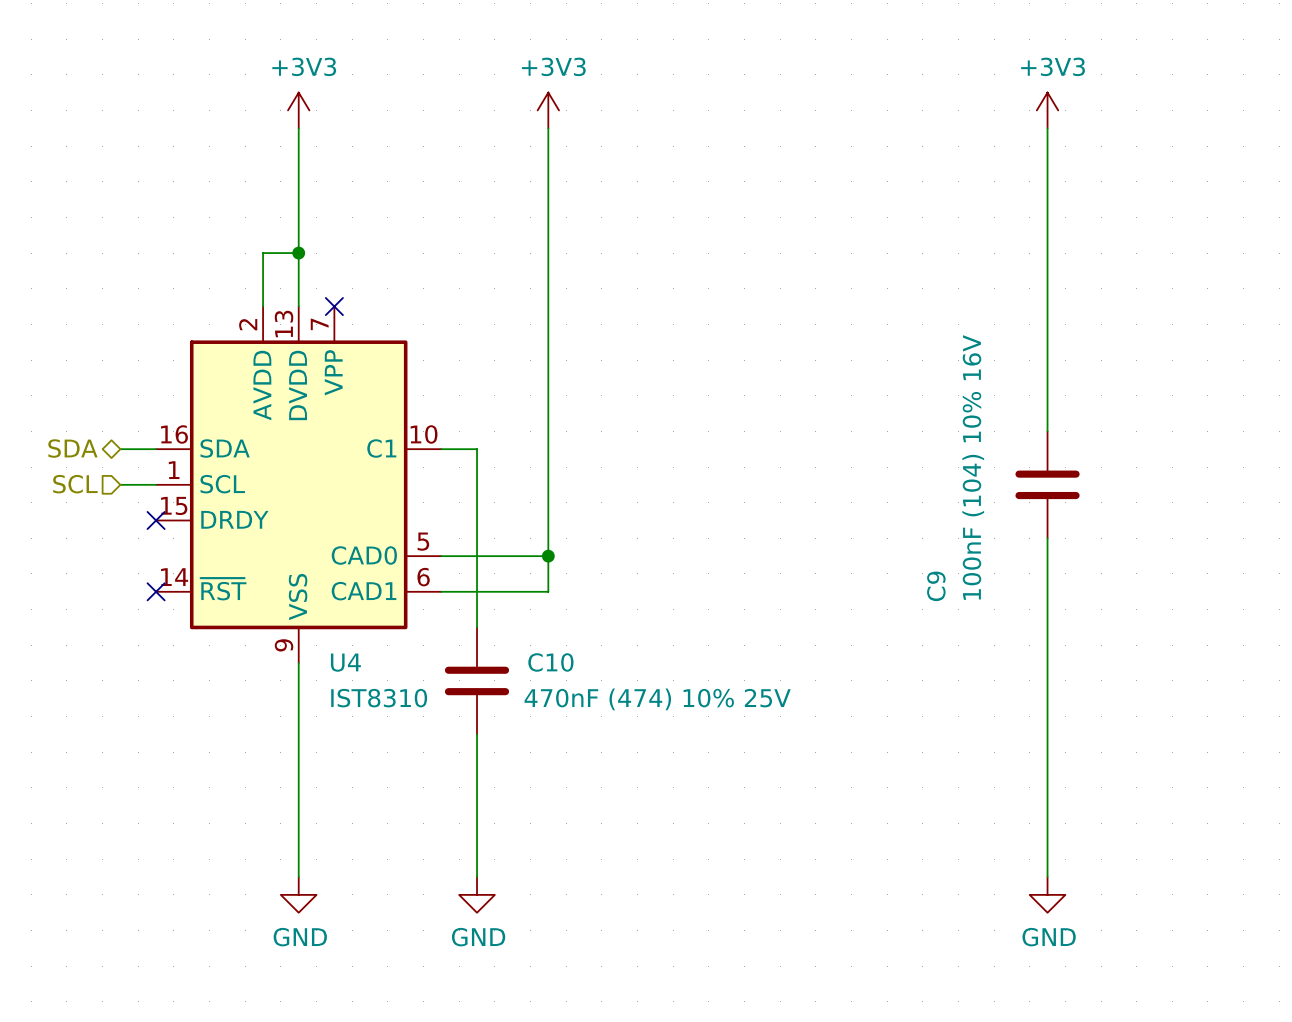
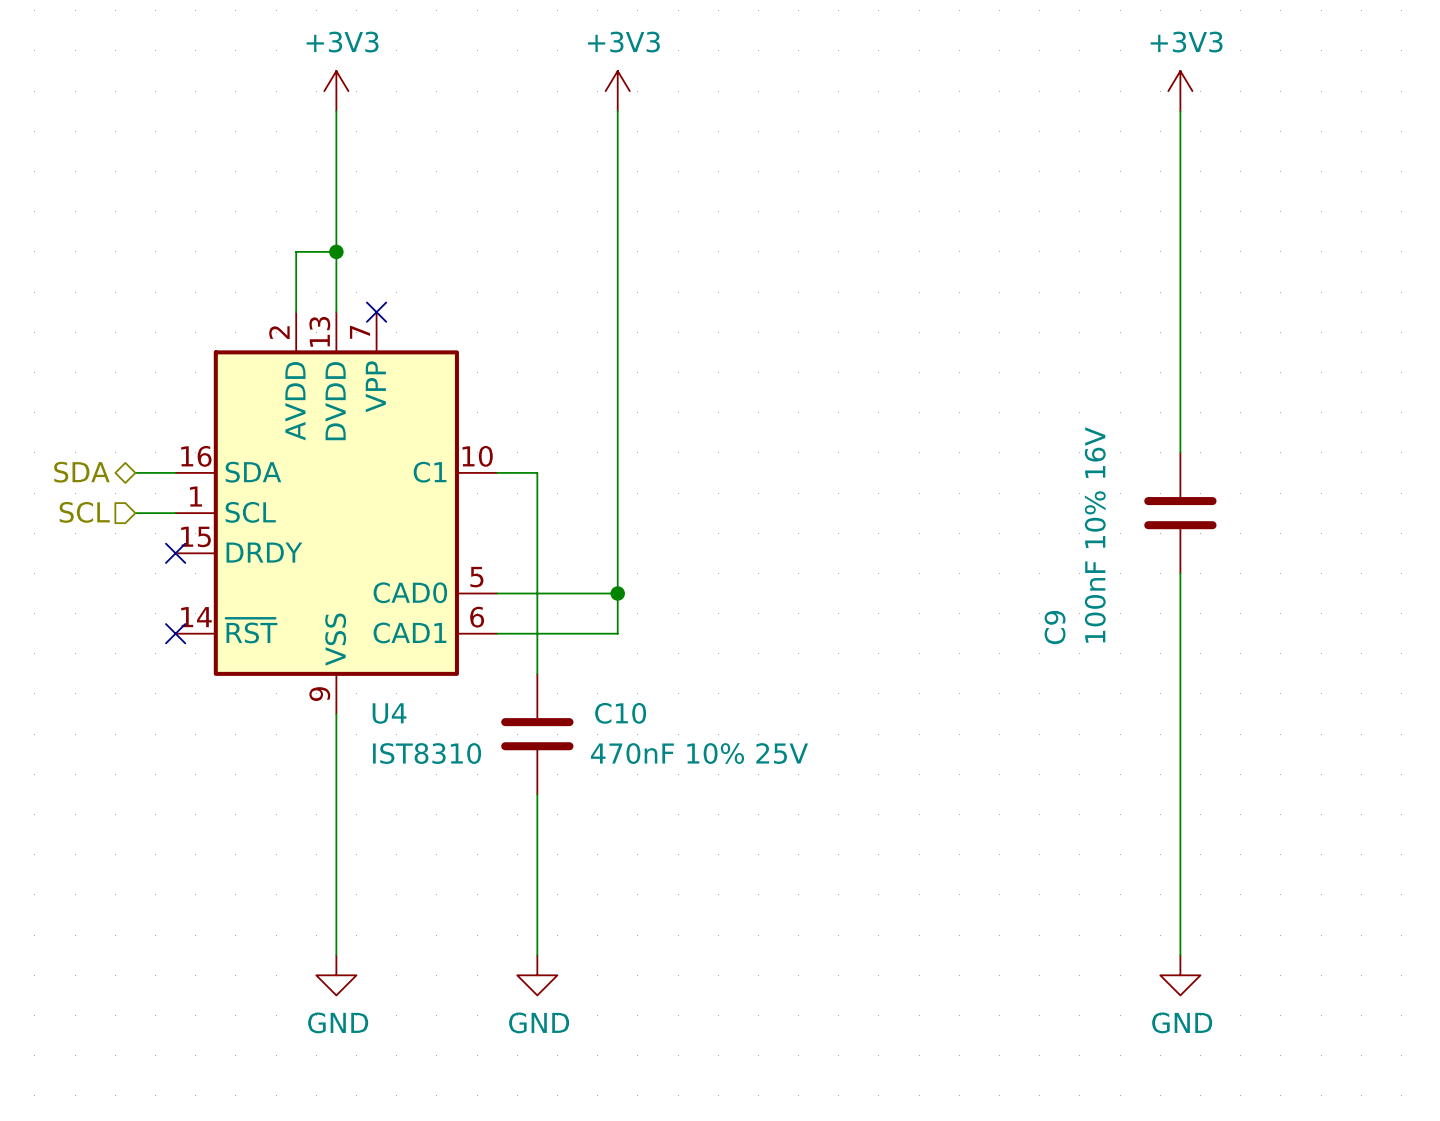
C9 value: 100nF (104) 10% 16V (973, 467) -> 100nF 10% 16V (1095, 535)
C10 value: 470nF (474) 10% 25V (657, 699) -> 470nF 10% 25V (699, 753)

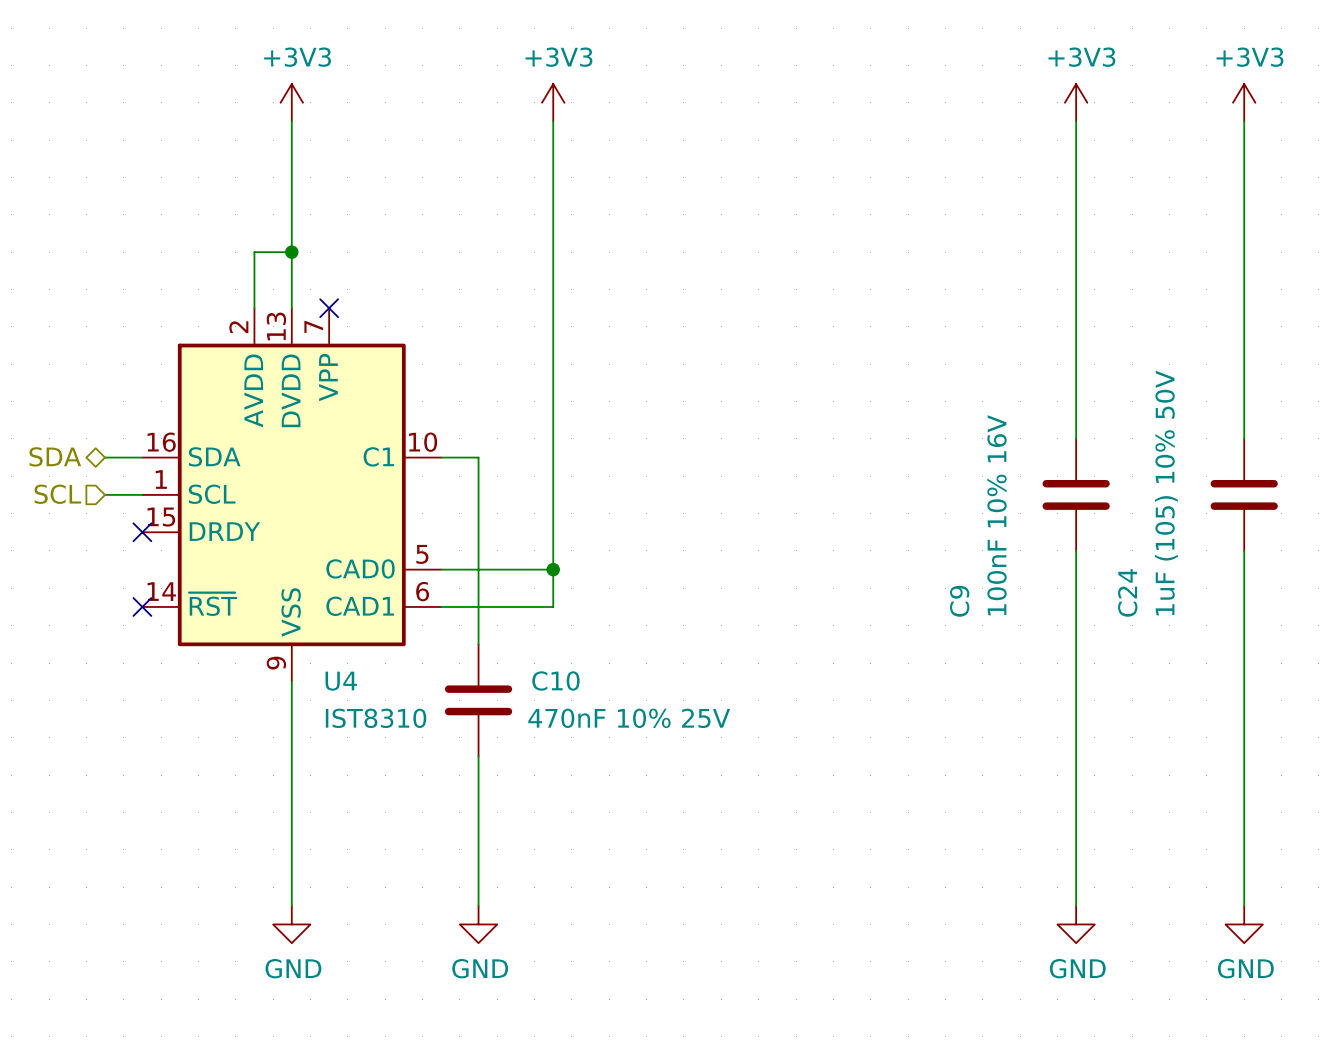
power symbol: none -> +3V3 (1244, 102)
wire: none -> (1244, 121) (1244, 438)
C24: none -> 1uF (105) 10% 50V (1244, 494)
wire: none -> (1244, 550) (1244, 905)
power symbol: none -> GND (1244, 924)

